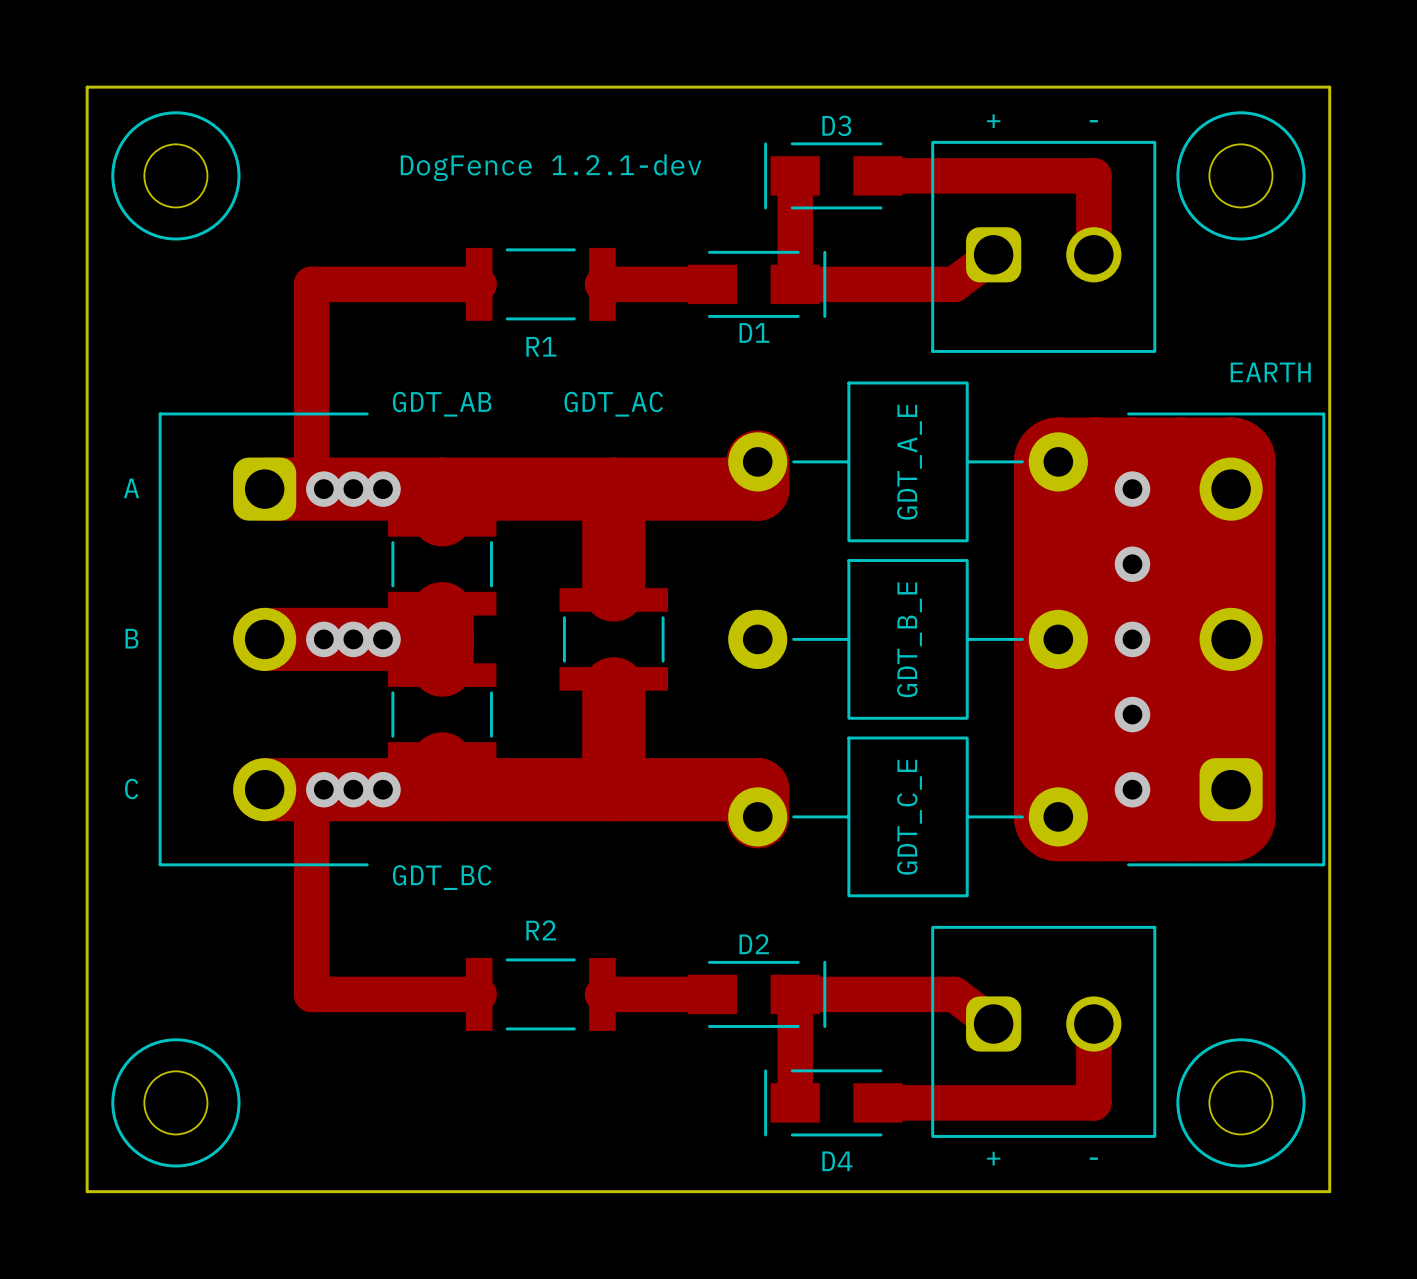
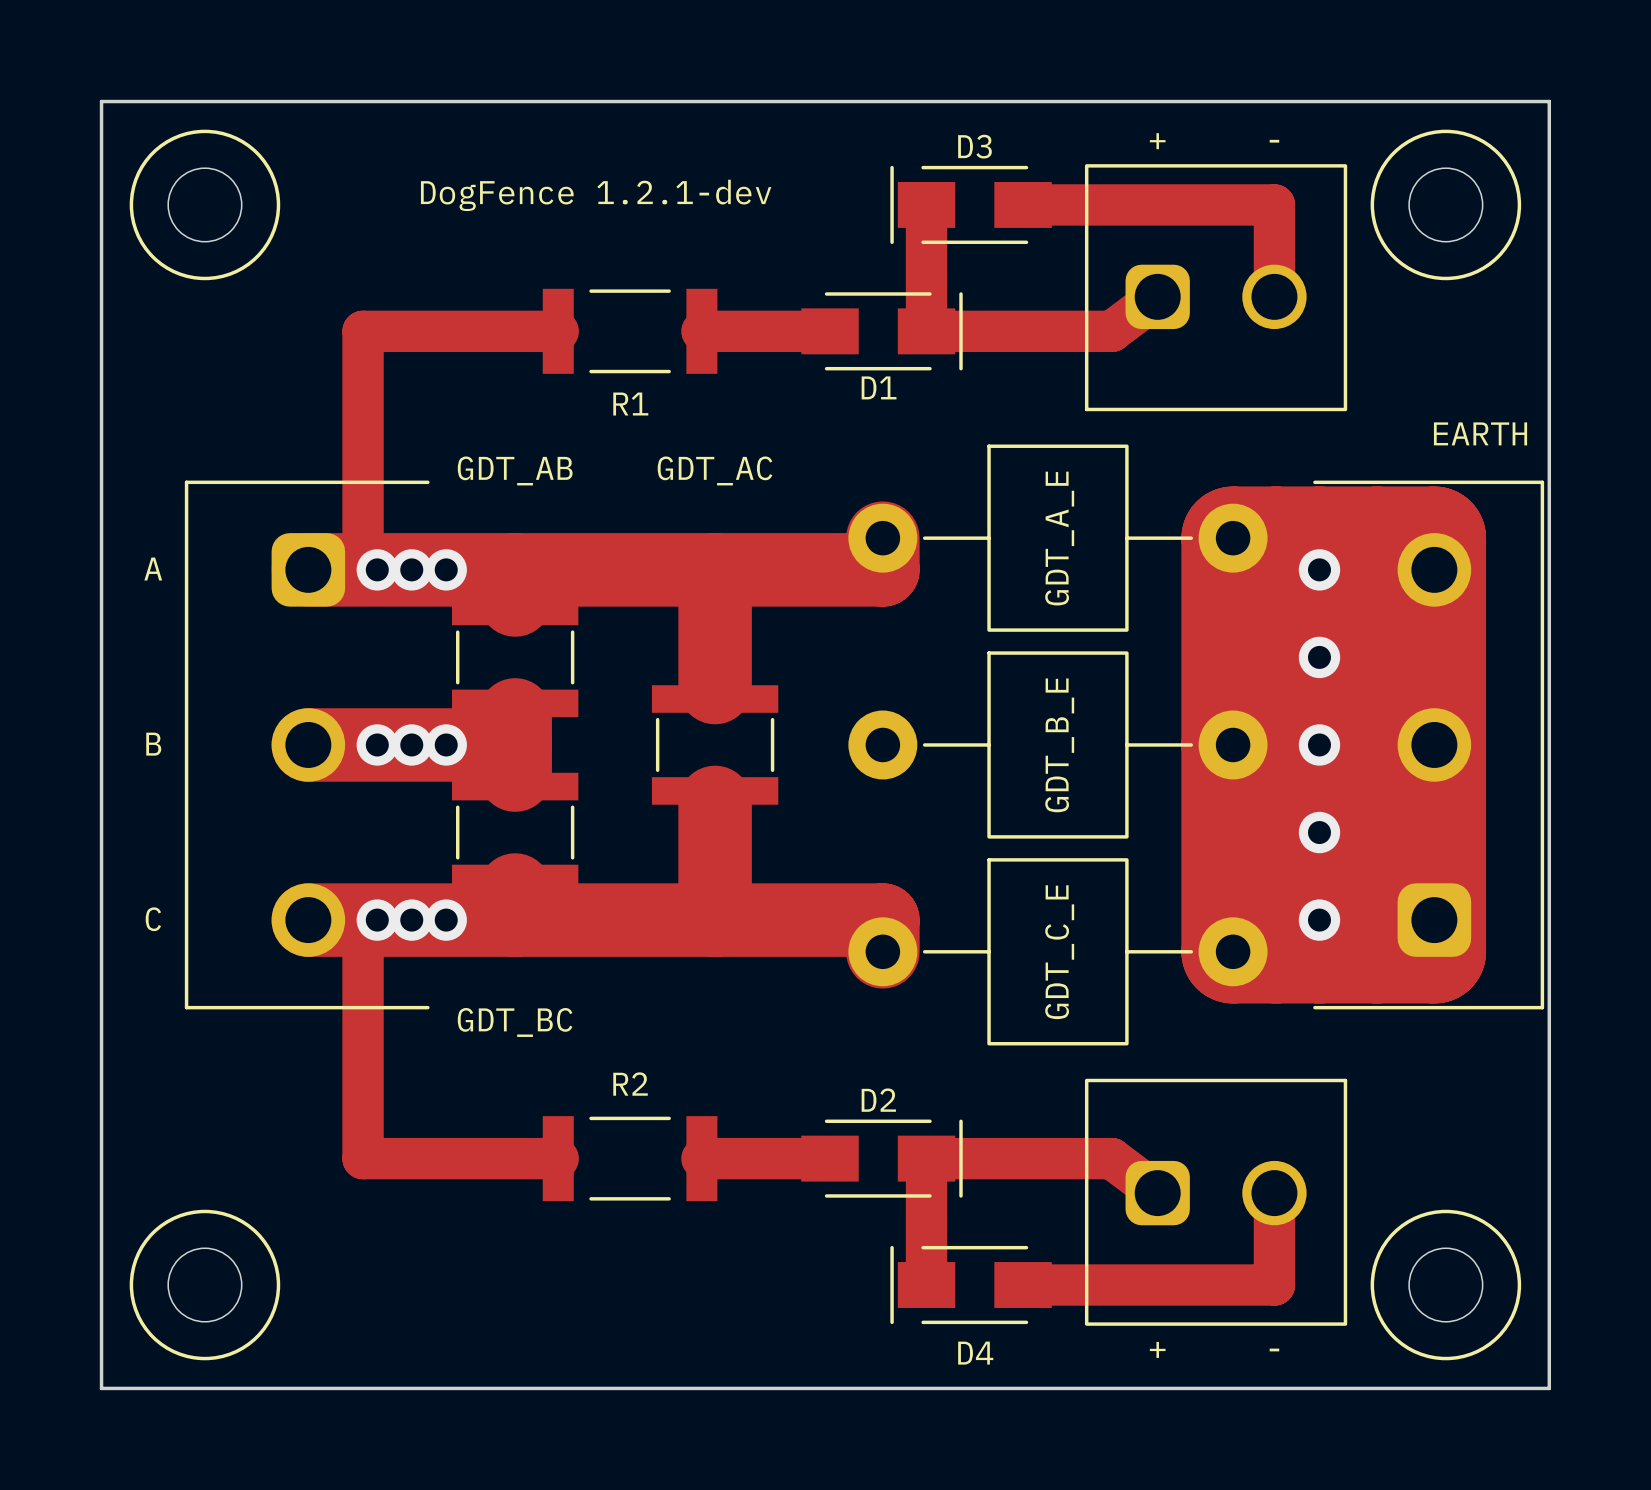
text position: DogFence 1.2.1-dev (551, 167) -> DogFence 1.2.1-dev (596, 195)

